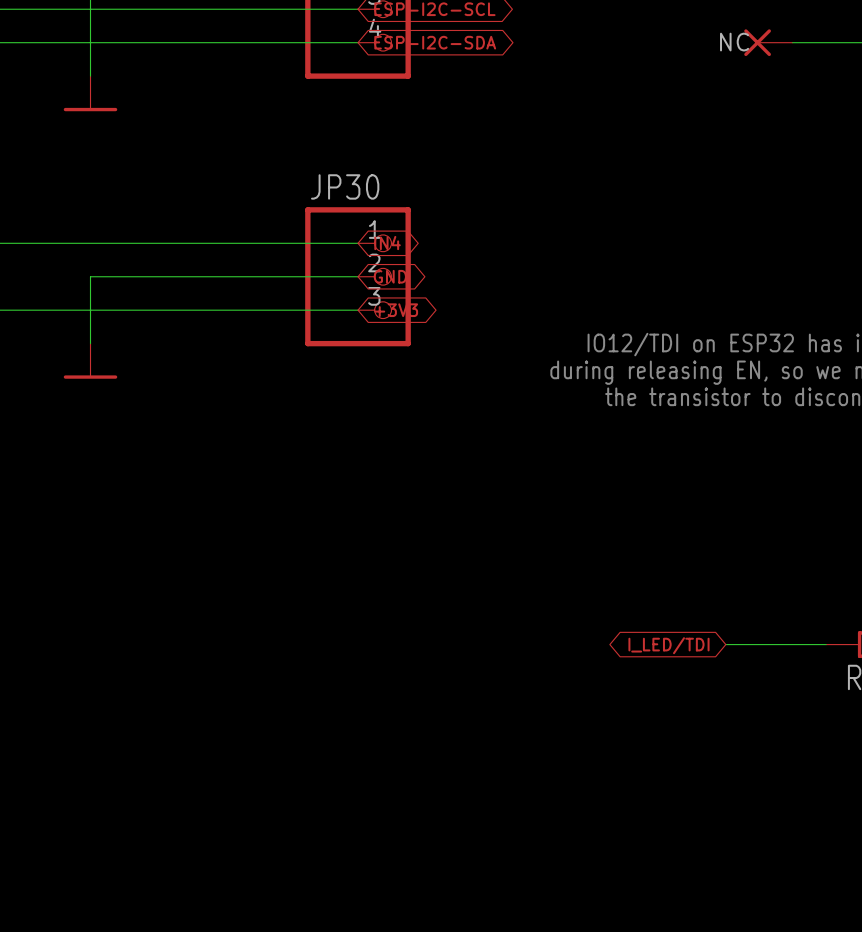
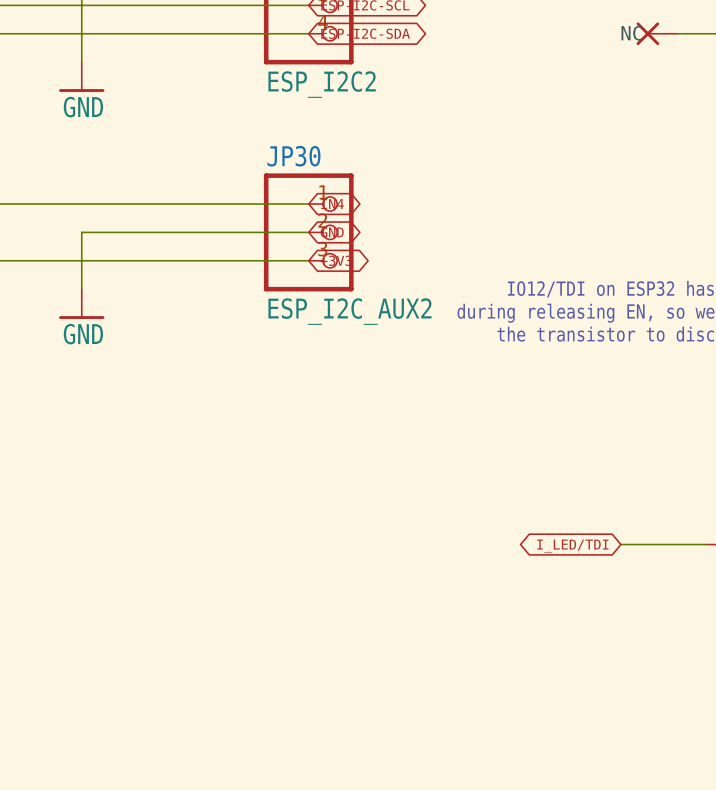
part value: none -> ESP_I2C2 (322, 84)
power symbol text: none -> GND (83, 107)
JP30 value: none -> ESP_I2C_AUX2 (349, 311)
power symbol text: none -> GND (83, 334)

